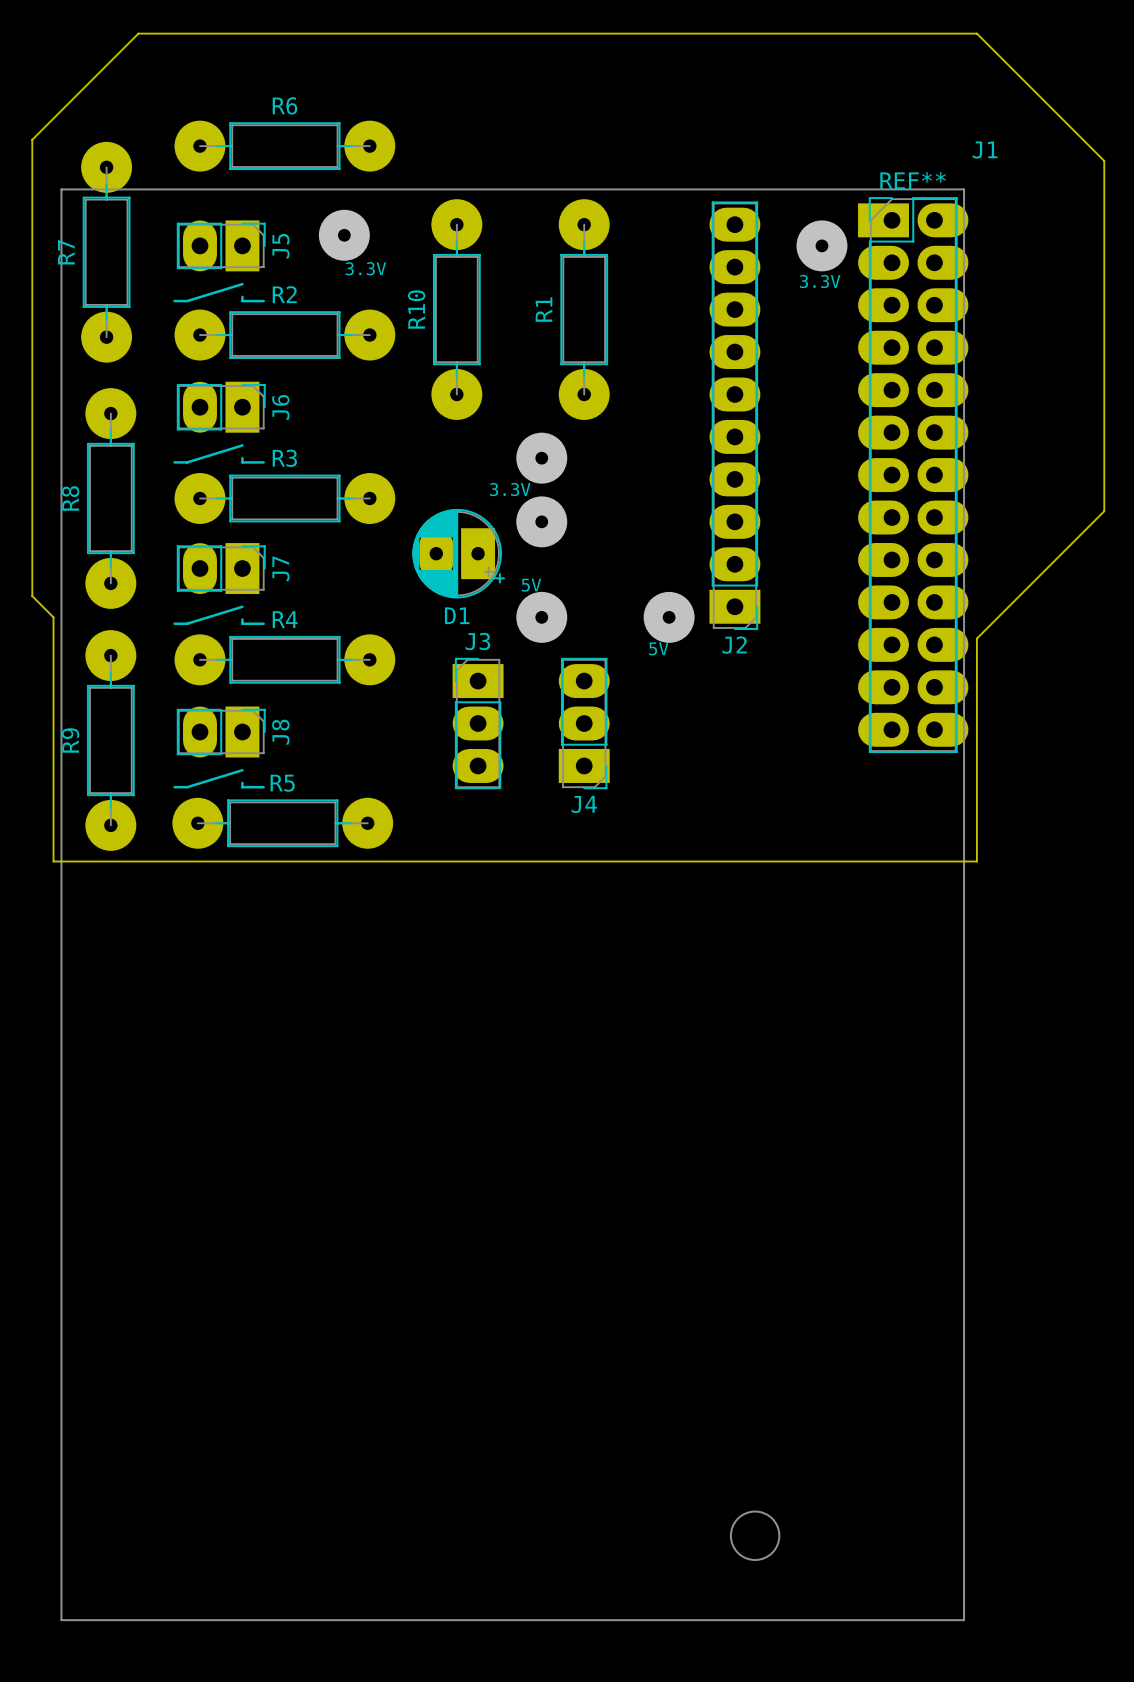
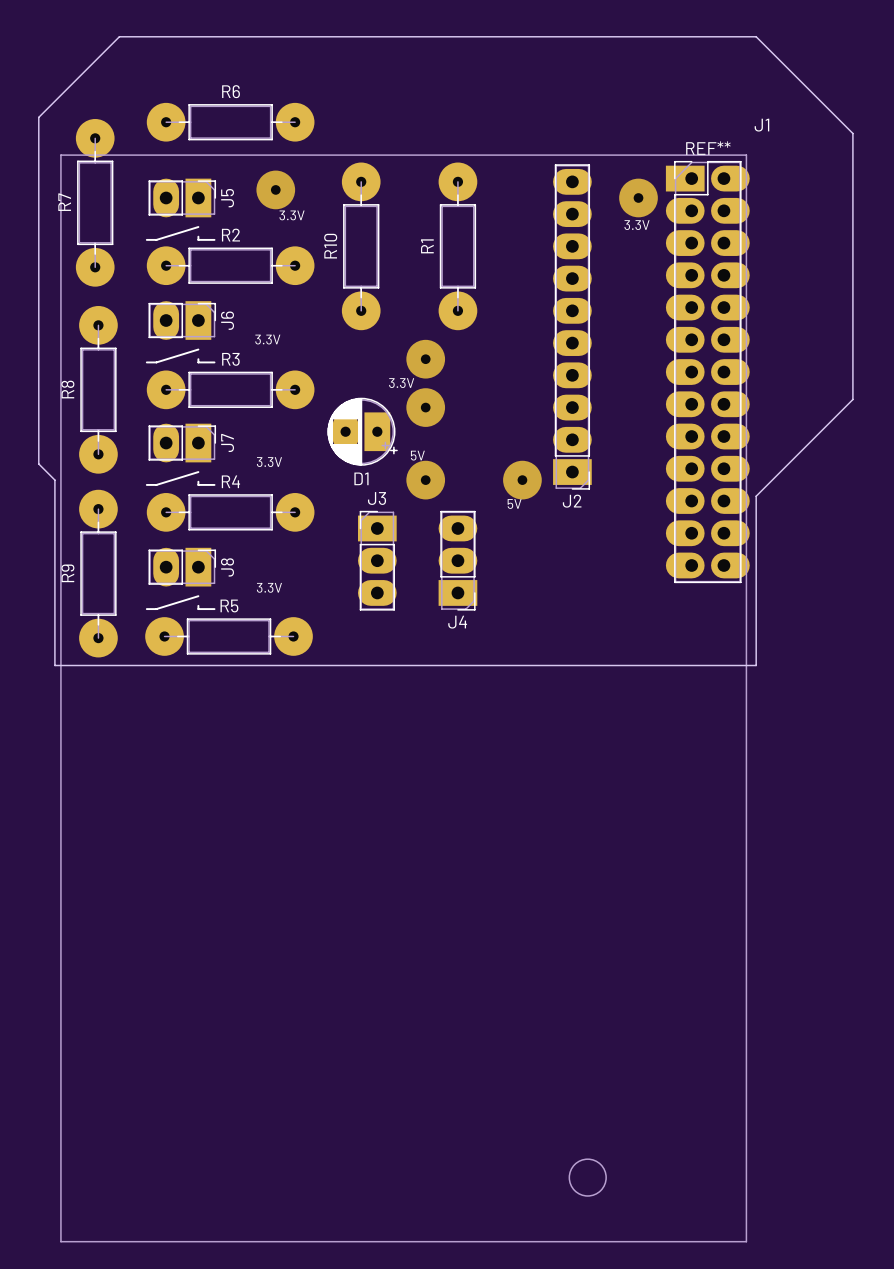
text: none -> 3.3V (267, 339)
text: none -> 3.3V (269, 462)
text: none -> 3.3V (269, 587)

